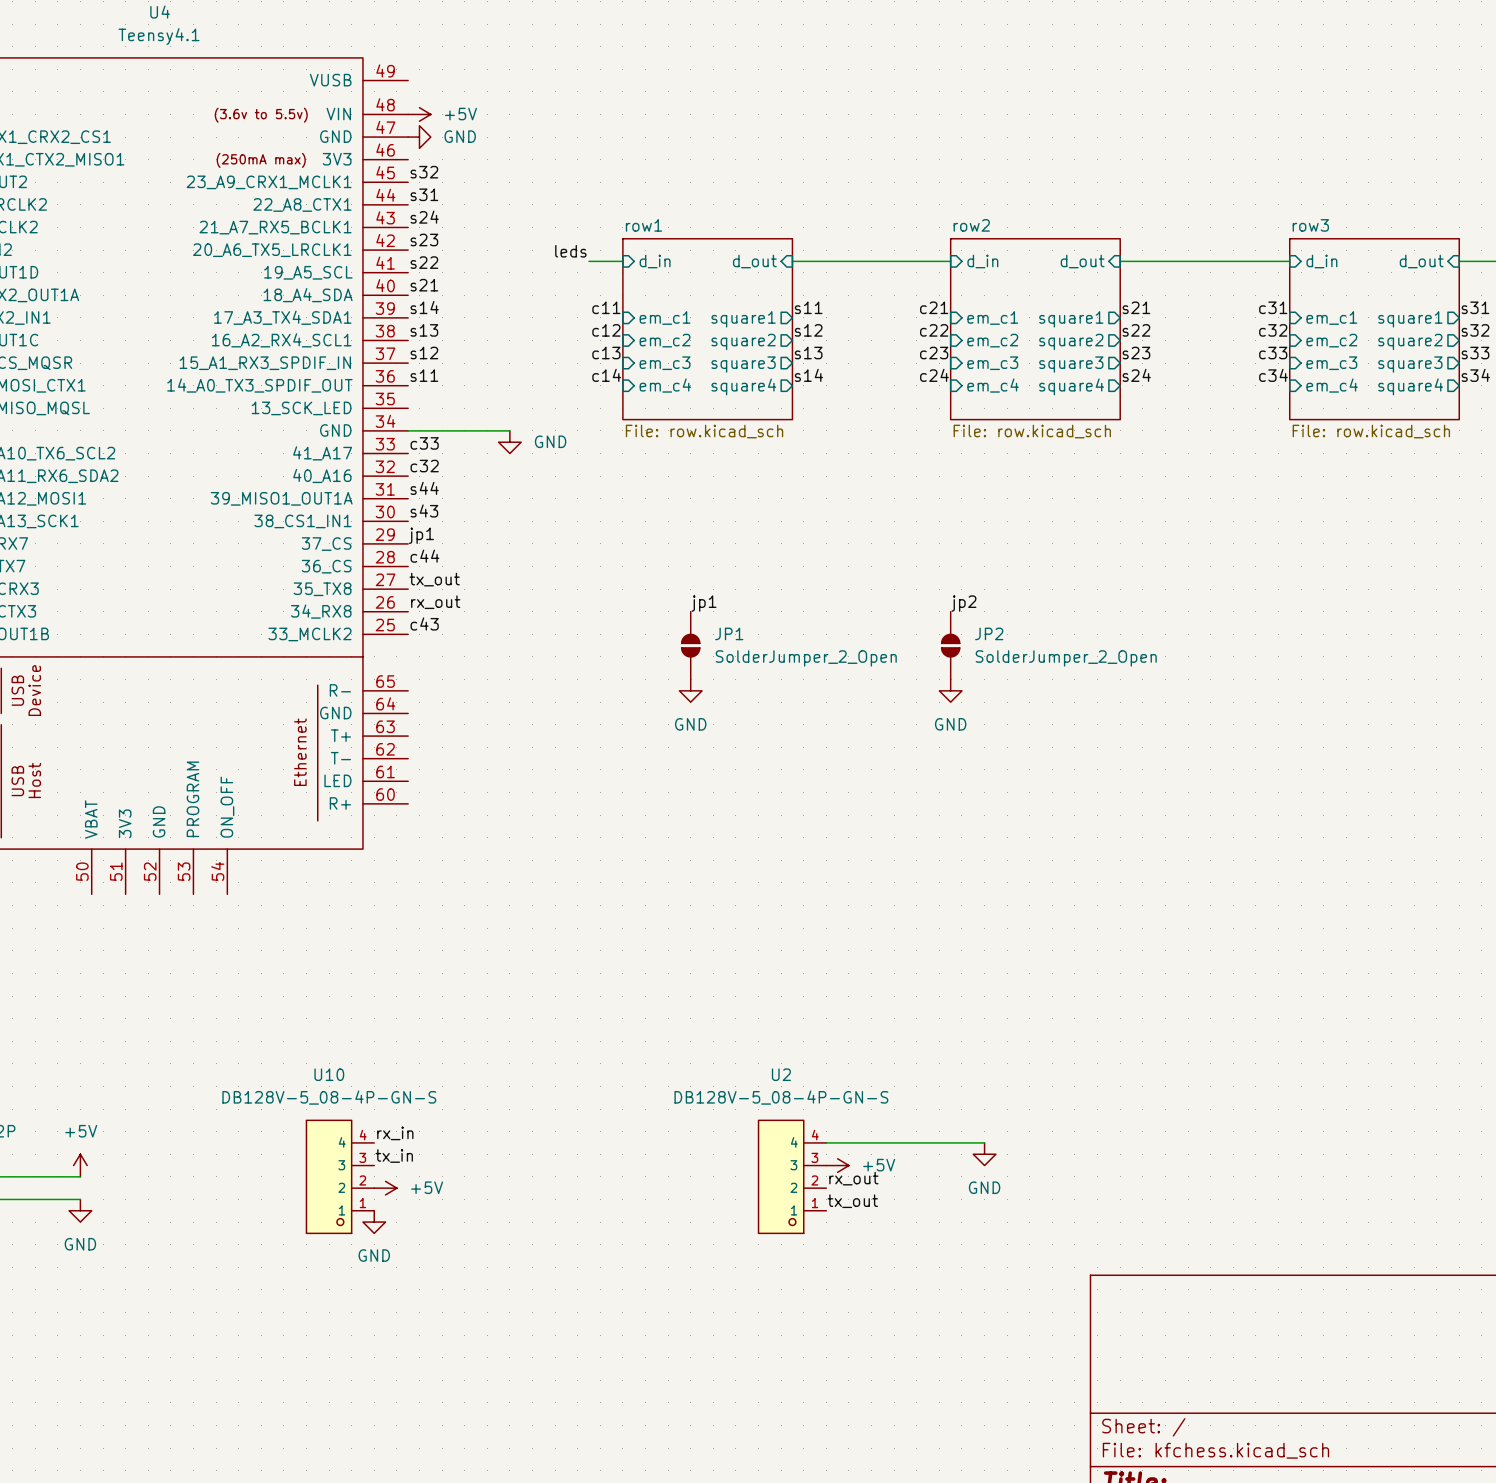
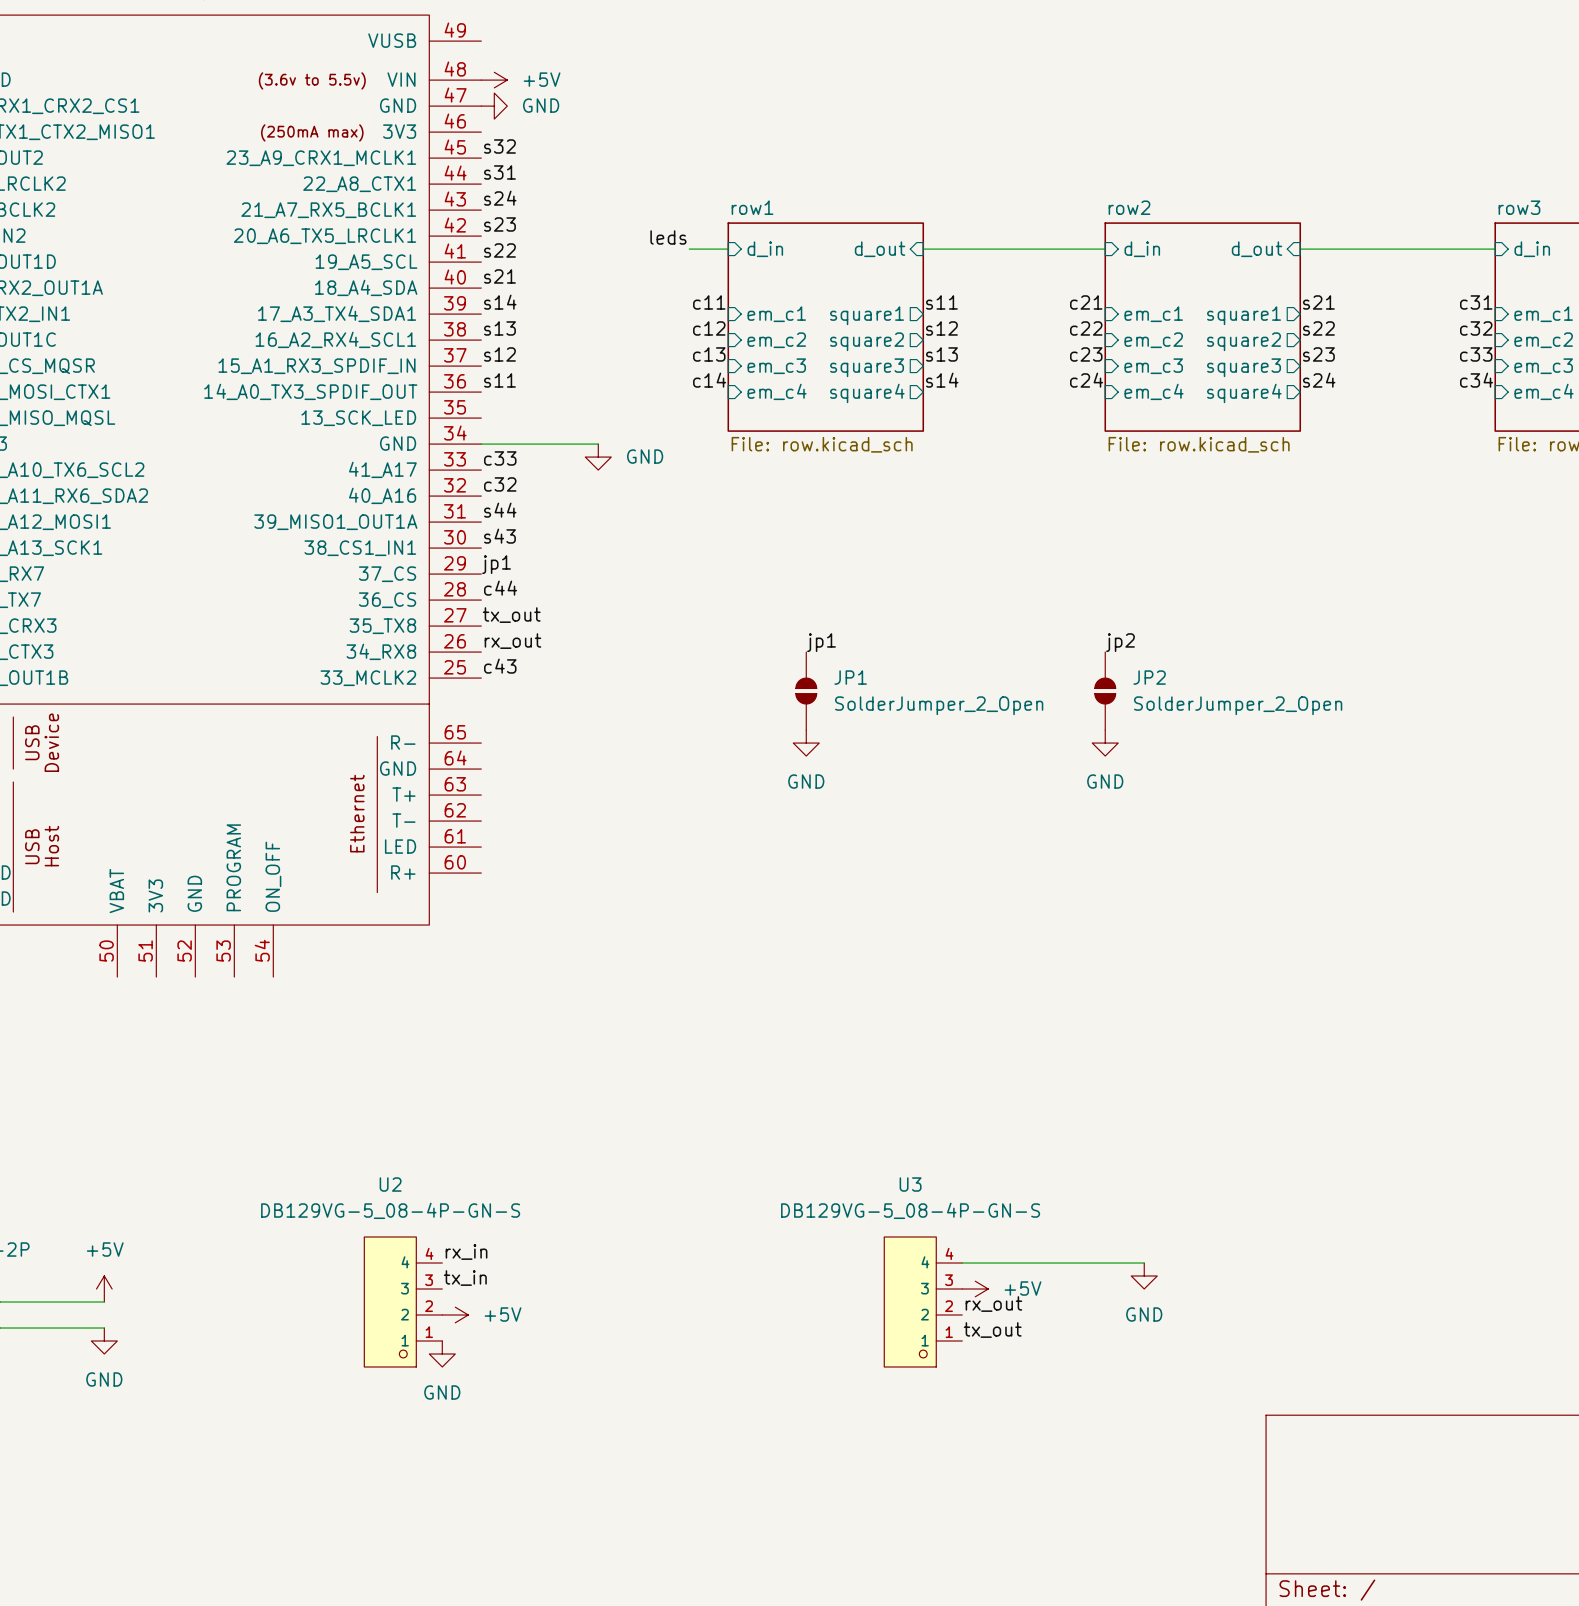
U10 name: U10 (329, 1074) -> U2 (390, 1184)
U2 name: U2 (781, 1074) -> U3 (910, 1184)
U10 value: DB128V-5_08-4P-GN-S (329, 1097) -> DB129VG-5_08-4P-GN-S (390, 1210)
U2 value: DB128V-5_08-4P-GN-S (781, 1097) -> DB129VG-5_08-4P-GN-S (910, 1210)

